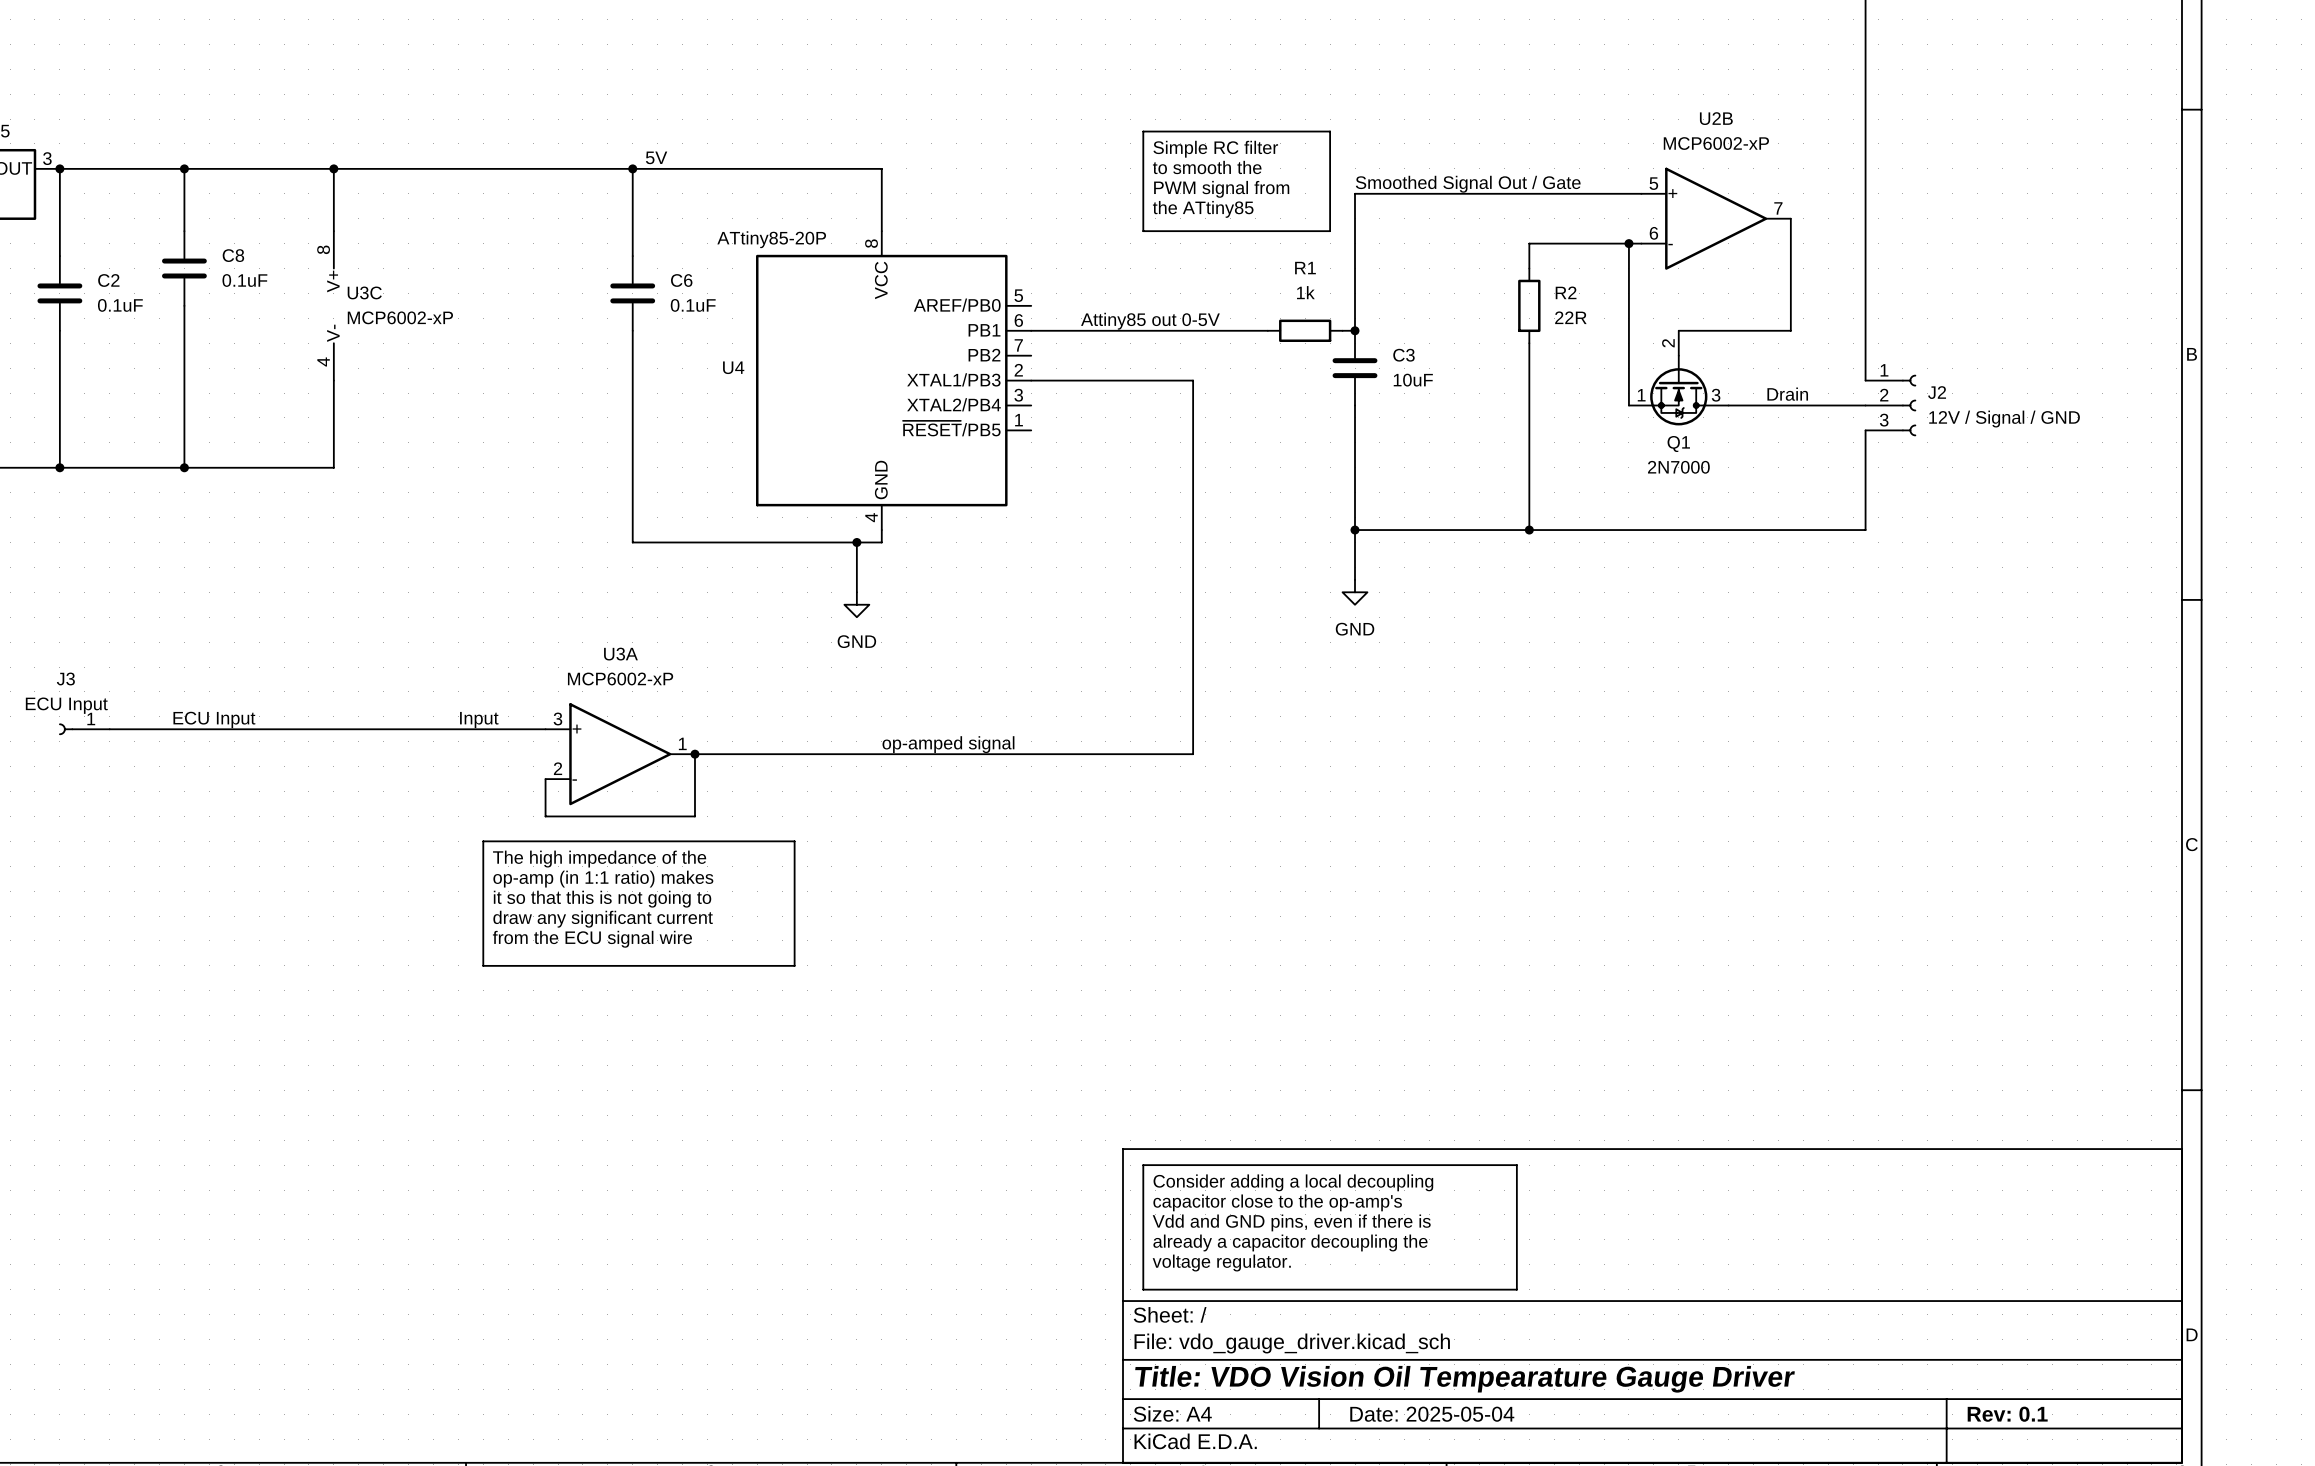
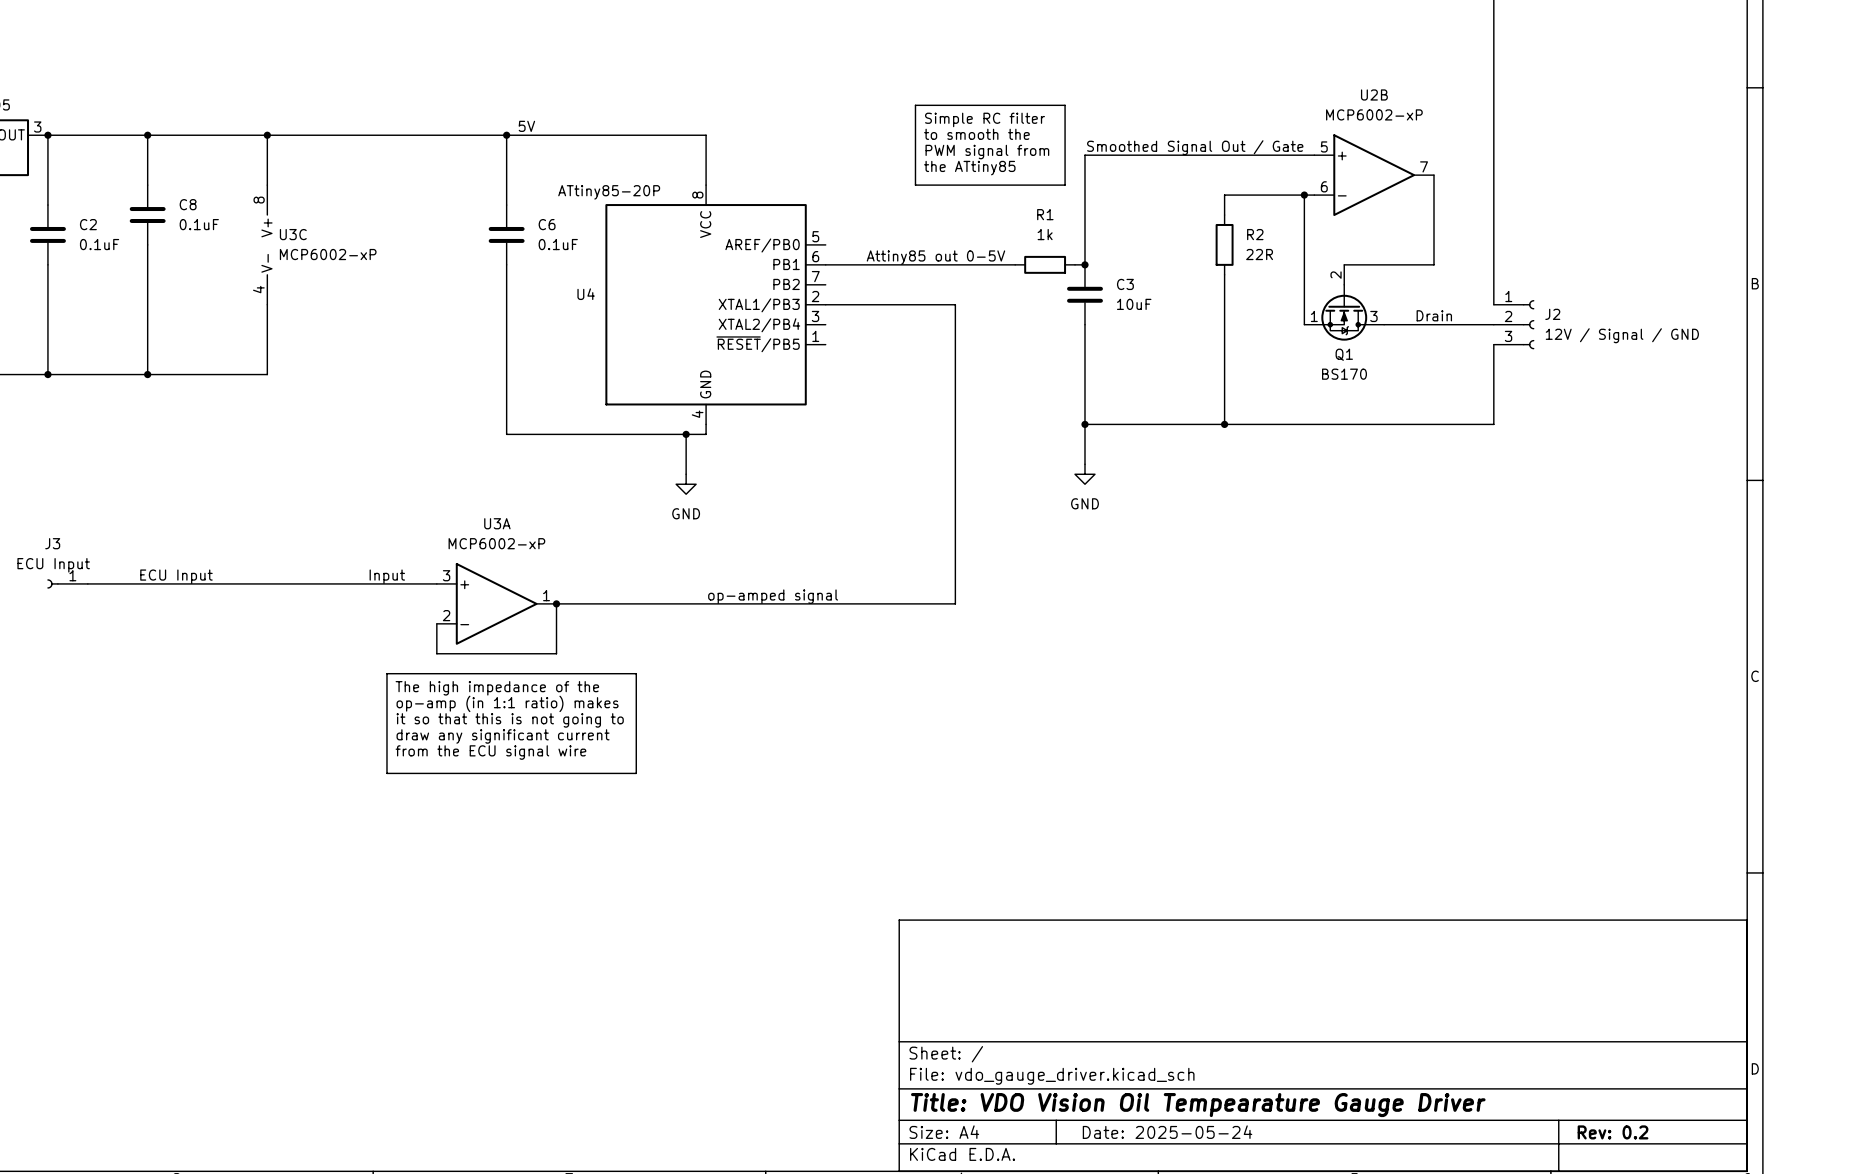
Q1 value: 2N7000 (1678, 467) -> BS170 (1344, 374)
line: (1143, 1165) (1516, 1165) (1516, 1289) (1143, 1289) (1143, 1165) -> none
text: Consider adding a local decoupling (1293, 1182) -> none
text: capacitor close to the op-amp's (1277, 1202) -> none
text: Vdd and GND pins, even if there is (1291, 1222) -> none
text: already a capacitor decoupling the (1290, 1242) -> none
text: voltage regulator. (1221, 1263) -> none
title block: Date: 2025-05-04 (1432, 1414) -> Date: 2025-05-24 (1167, 1132)
title block: Rev: 0.1 (2007, 1414) -> Rev: 0.2 (1613, 1132)

